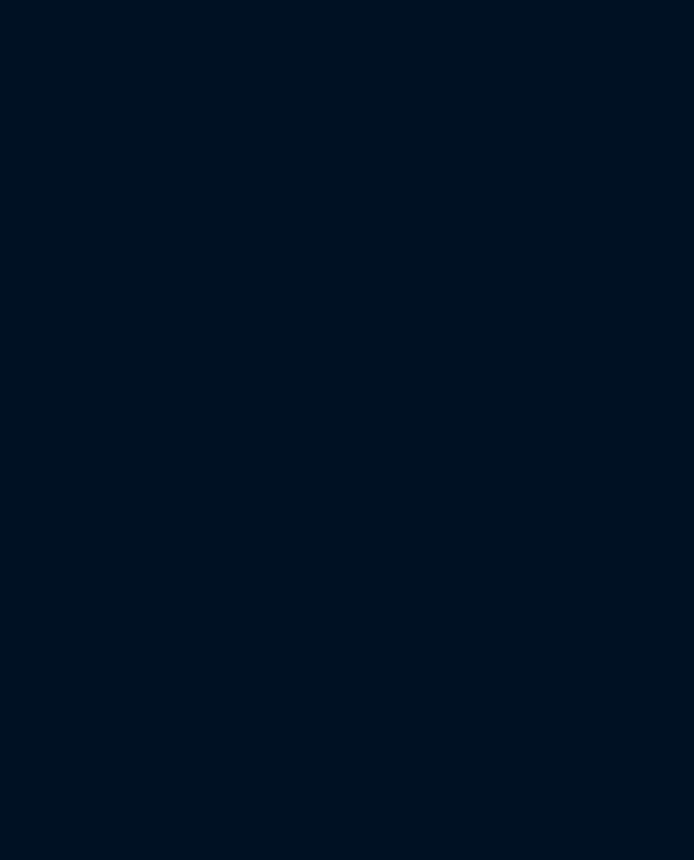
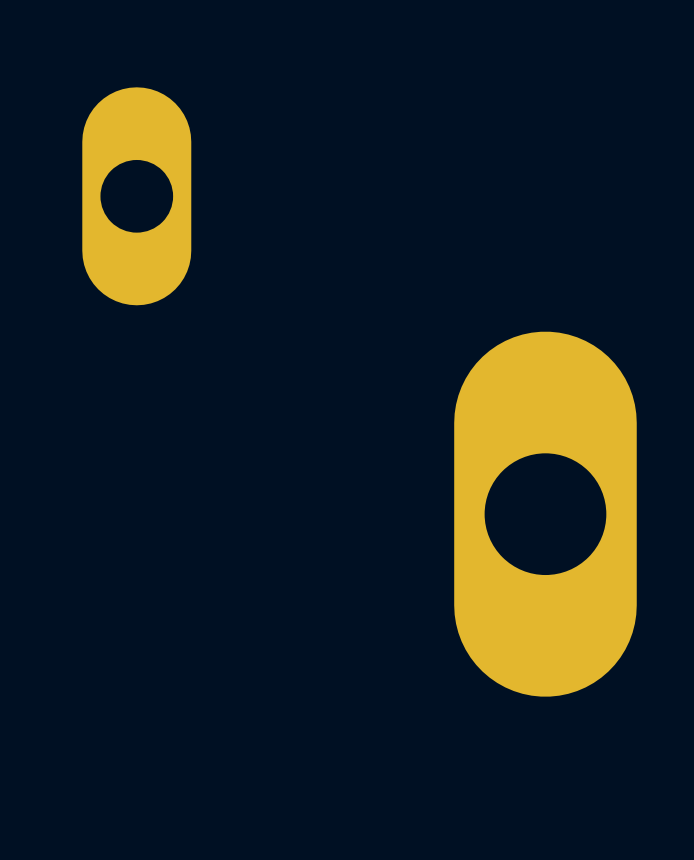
part: none -> (136, 196)
part: none -> (545, 514)

